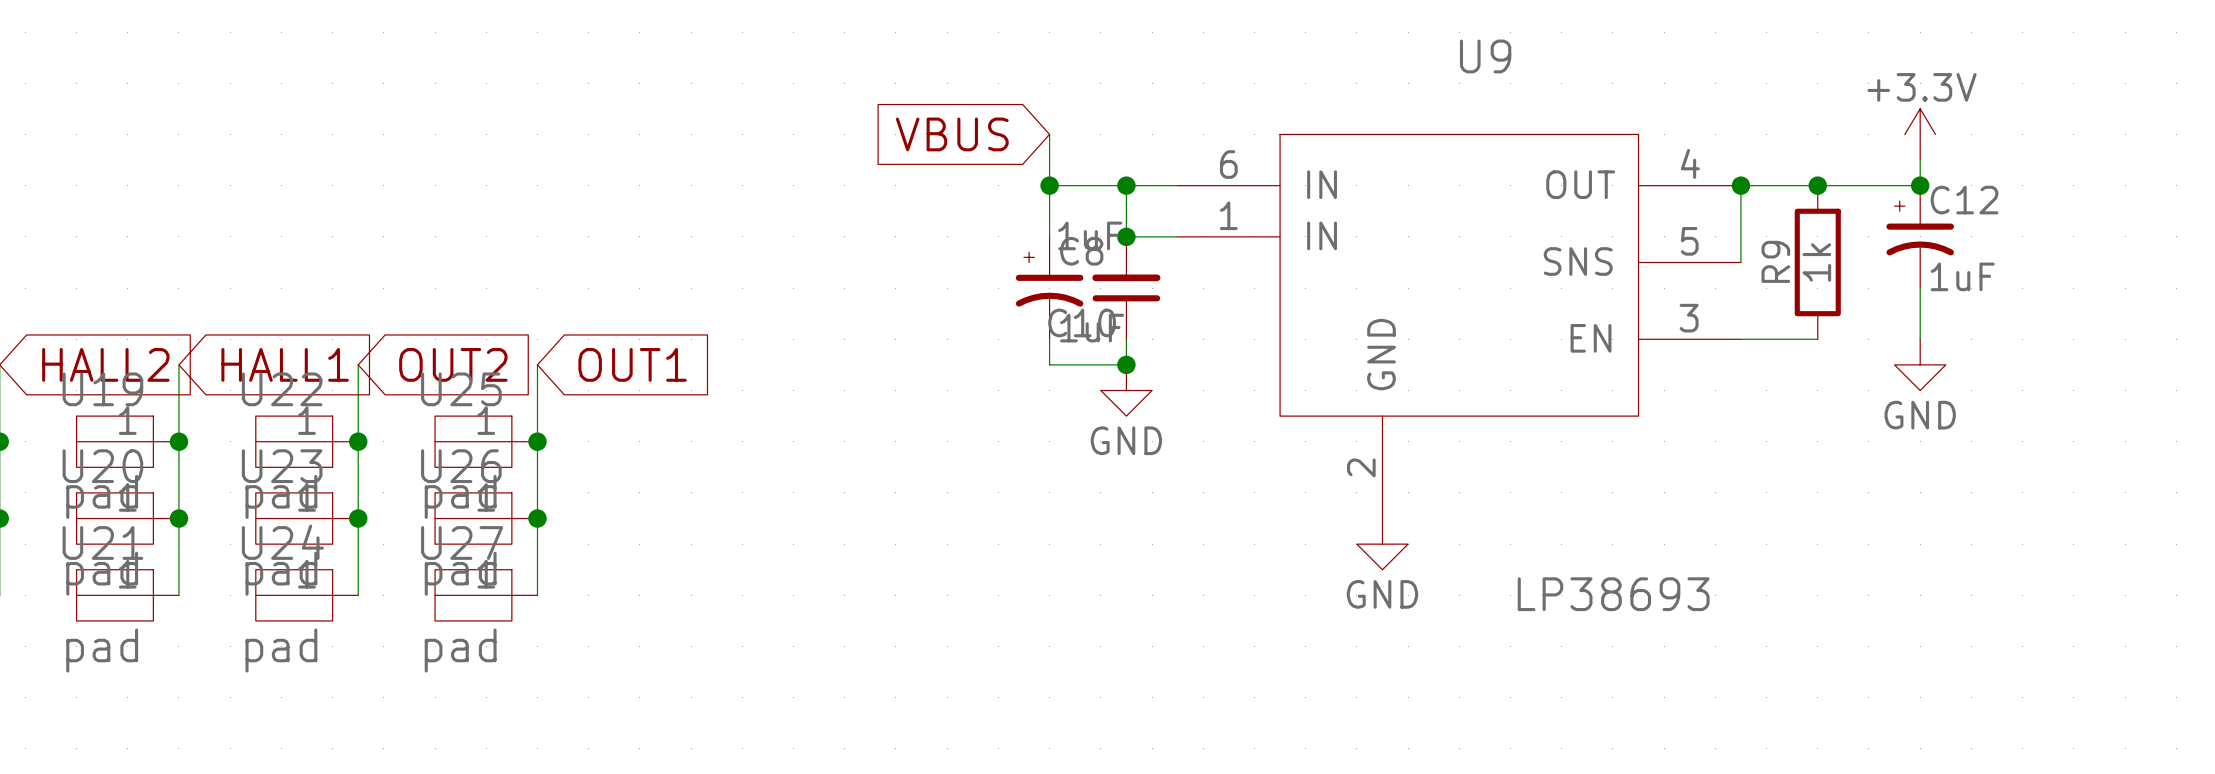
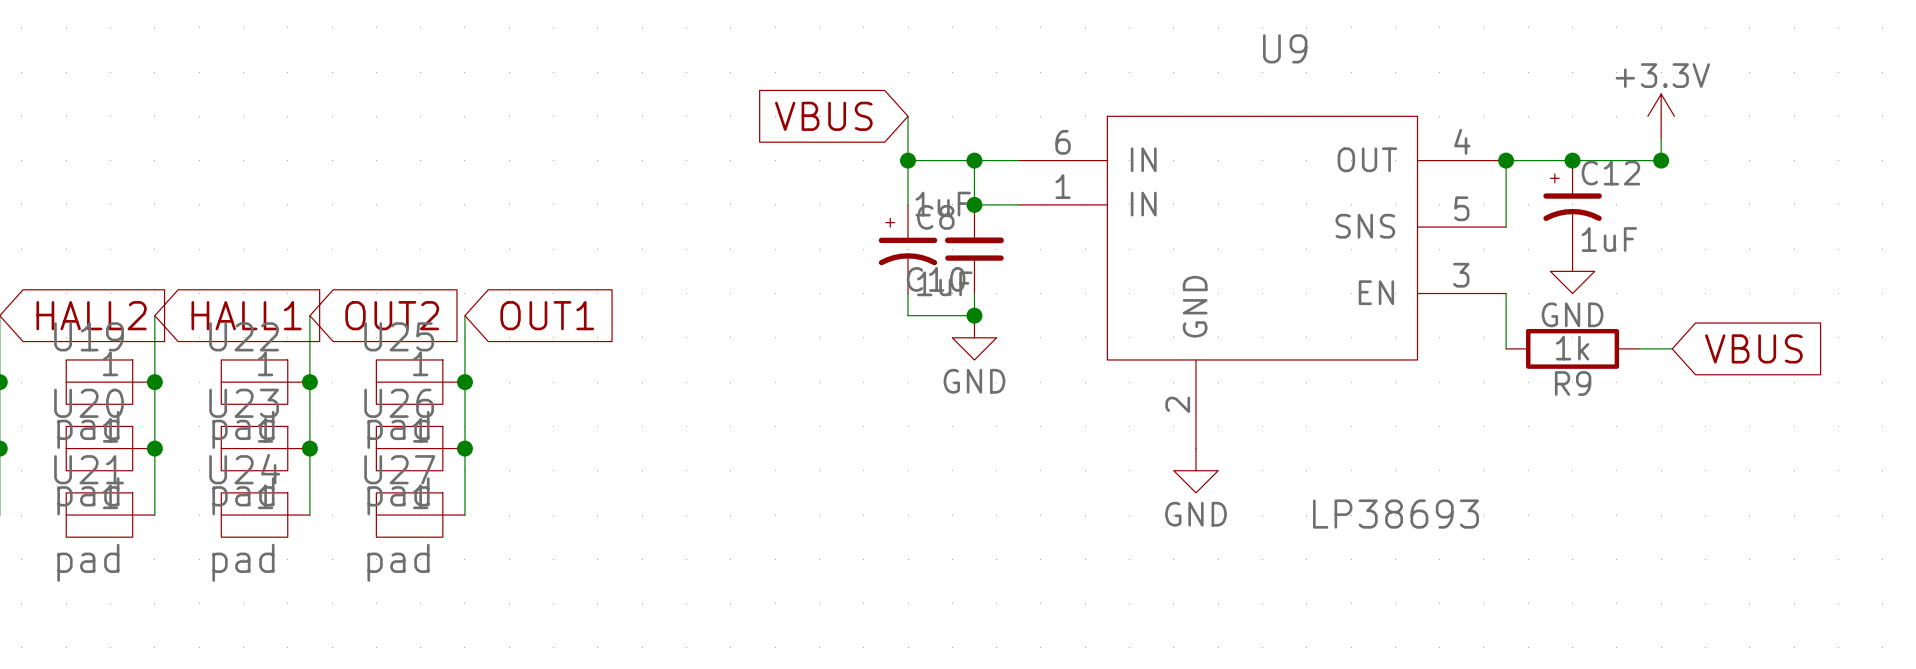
C12 position: (1920, 236) -> (1572, 204)
R9 name position: R9 (1775, 261) -> R9 (1573, 383)
R9 rotation: 0° (1817, 262) -> 90° clockwise (1572, 348)
R9 position: (1817, 262) -> (1572, 348)
wire: (1920, 288) (1920, 339) -> none
wire: (1740, 339) (1817, 339) -> (1506, 293) (1506, 348)
power symbol position: GND (1920, 364) -> GND (1572, 271)
wire: none -> (1639, 348) (1672, 348)
global label: none -> VBUS (1753, 348)

